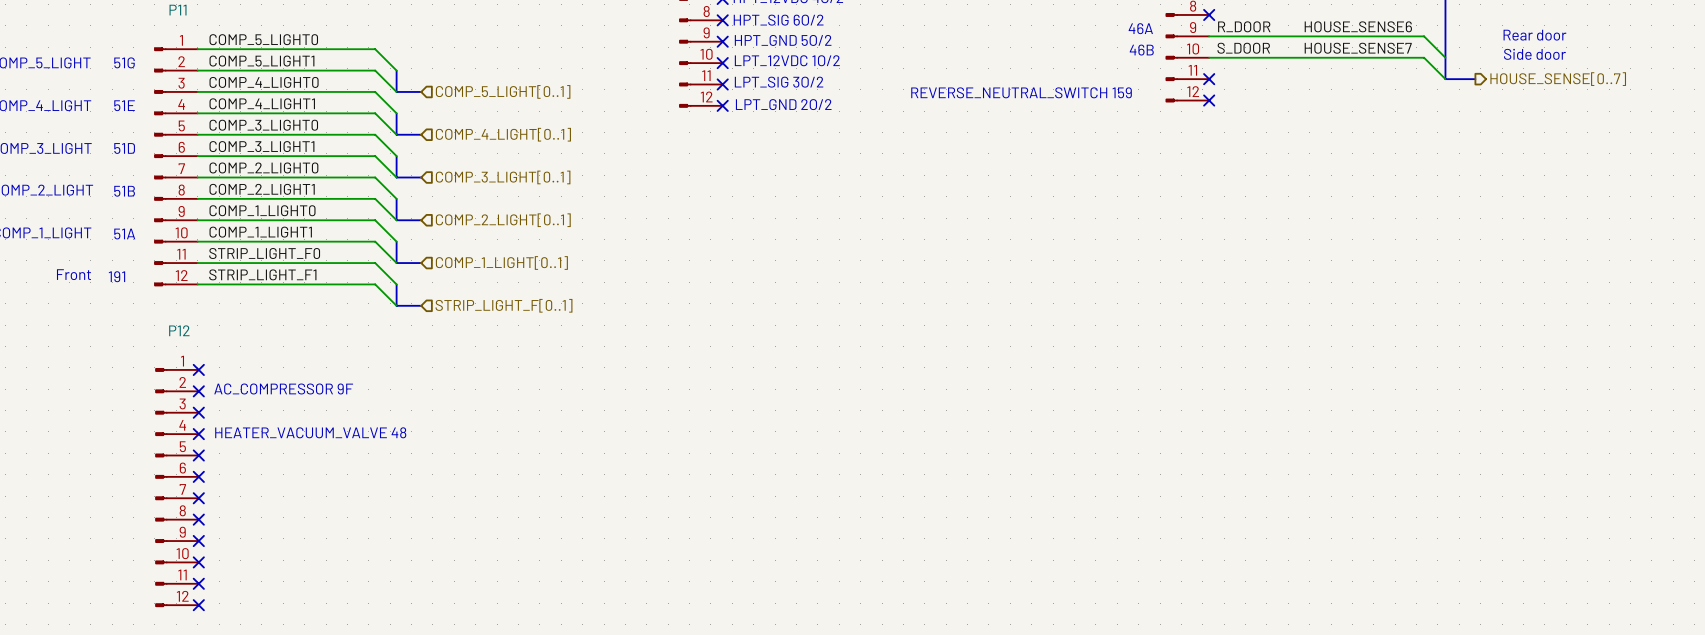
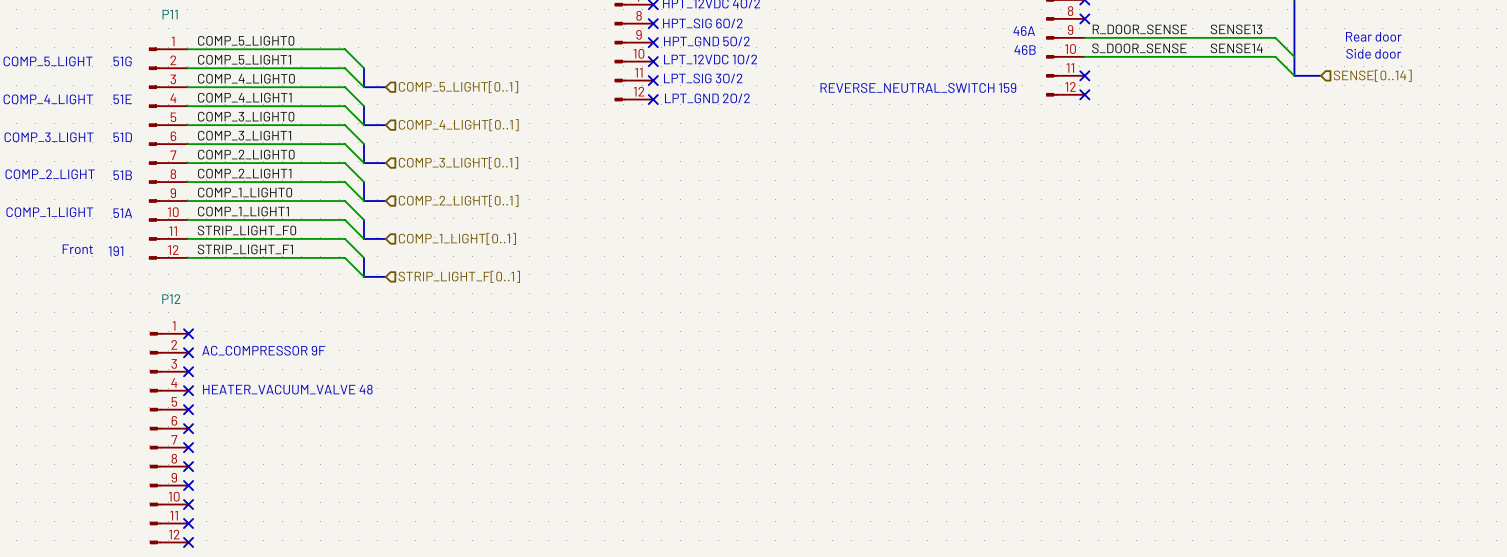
label: R_DOOR (1244, 26) -> R_DOOR_SENSE (1139, 29)
label: HOUSE_SENSE6 (1358, 26) -> none
label: none -> SENSE13 (1236, 29)
label: S_DOOR (1243, 48) -> S_DOOR_SENSE (1139, 48)
label: HOUSE_SENSE7 (1358, 48) -> none
label: none -> SENSE14 (1236, 48)
hierarchical label shape: output (1558, 79) -> input (1372, 75)
hierarchical label: HOUSE_SENSE[0..7] (1558, 79) -> SENSE[0..14] (1372, 75)

